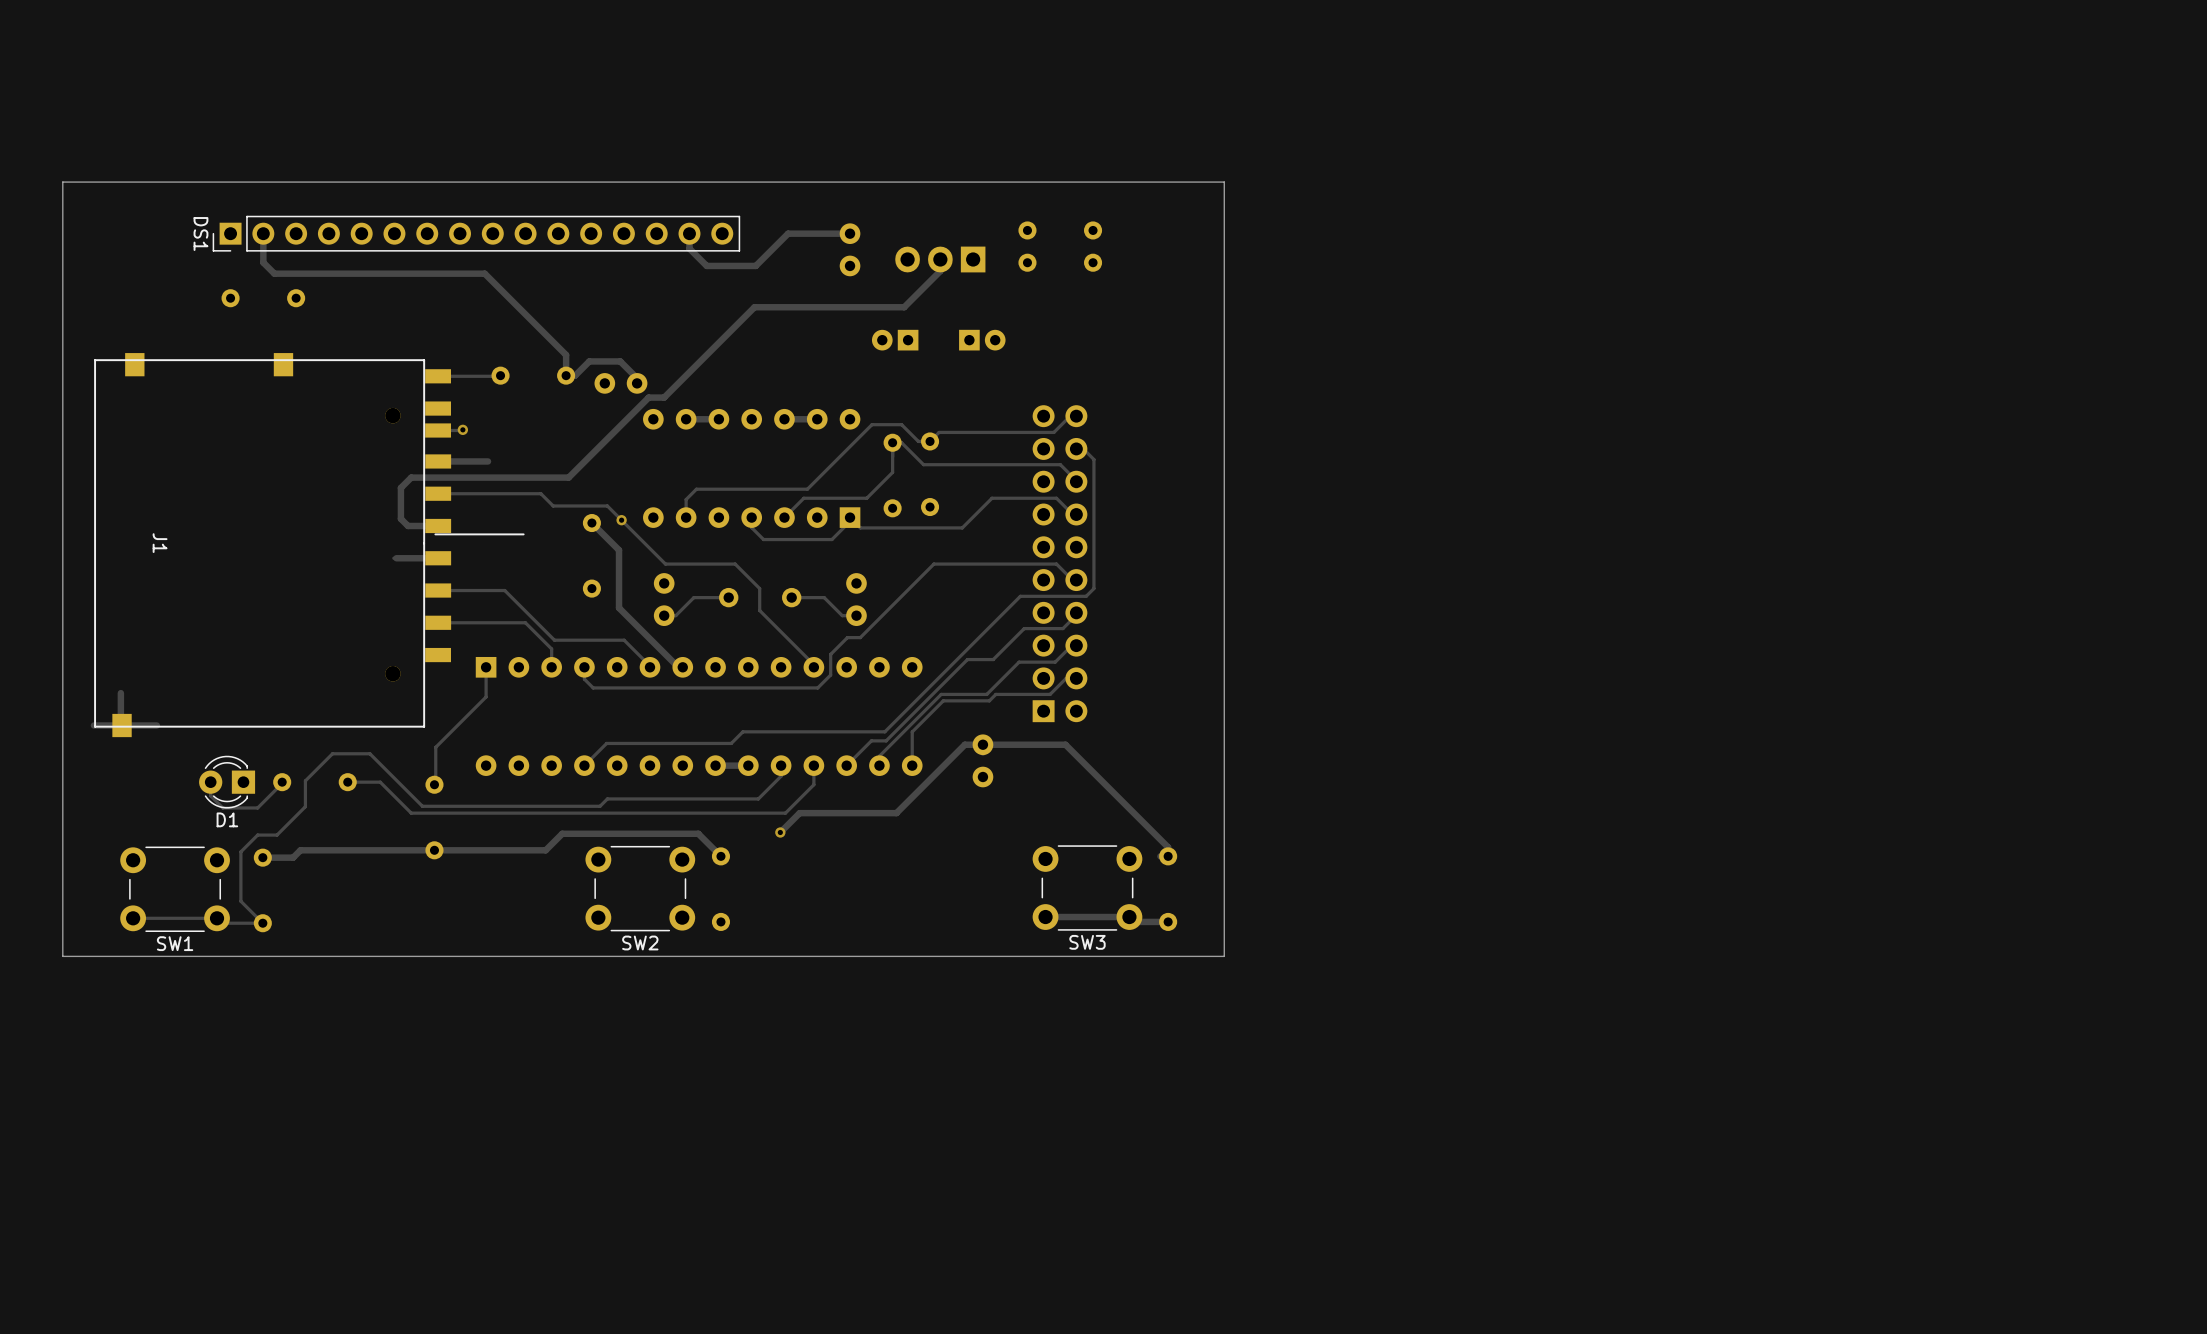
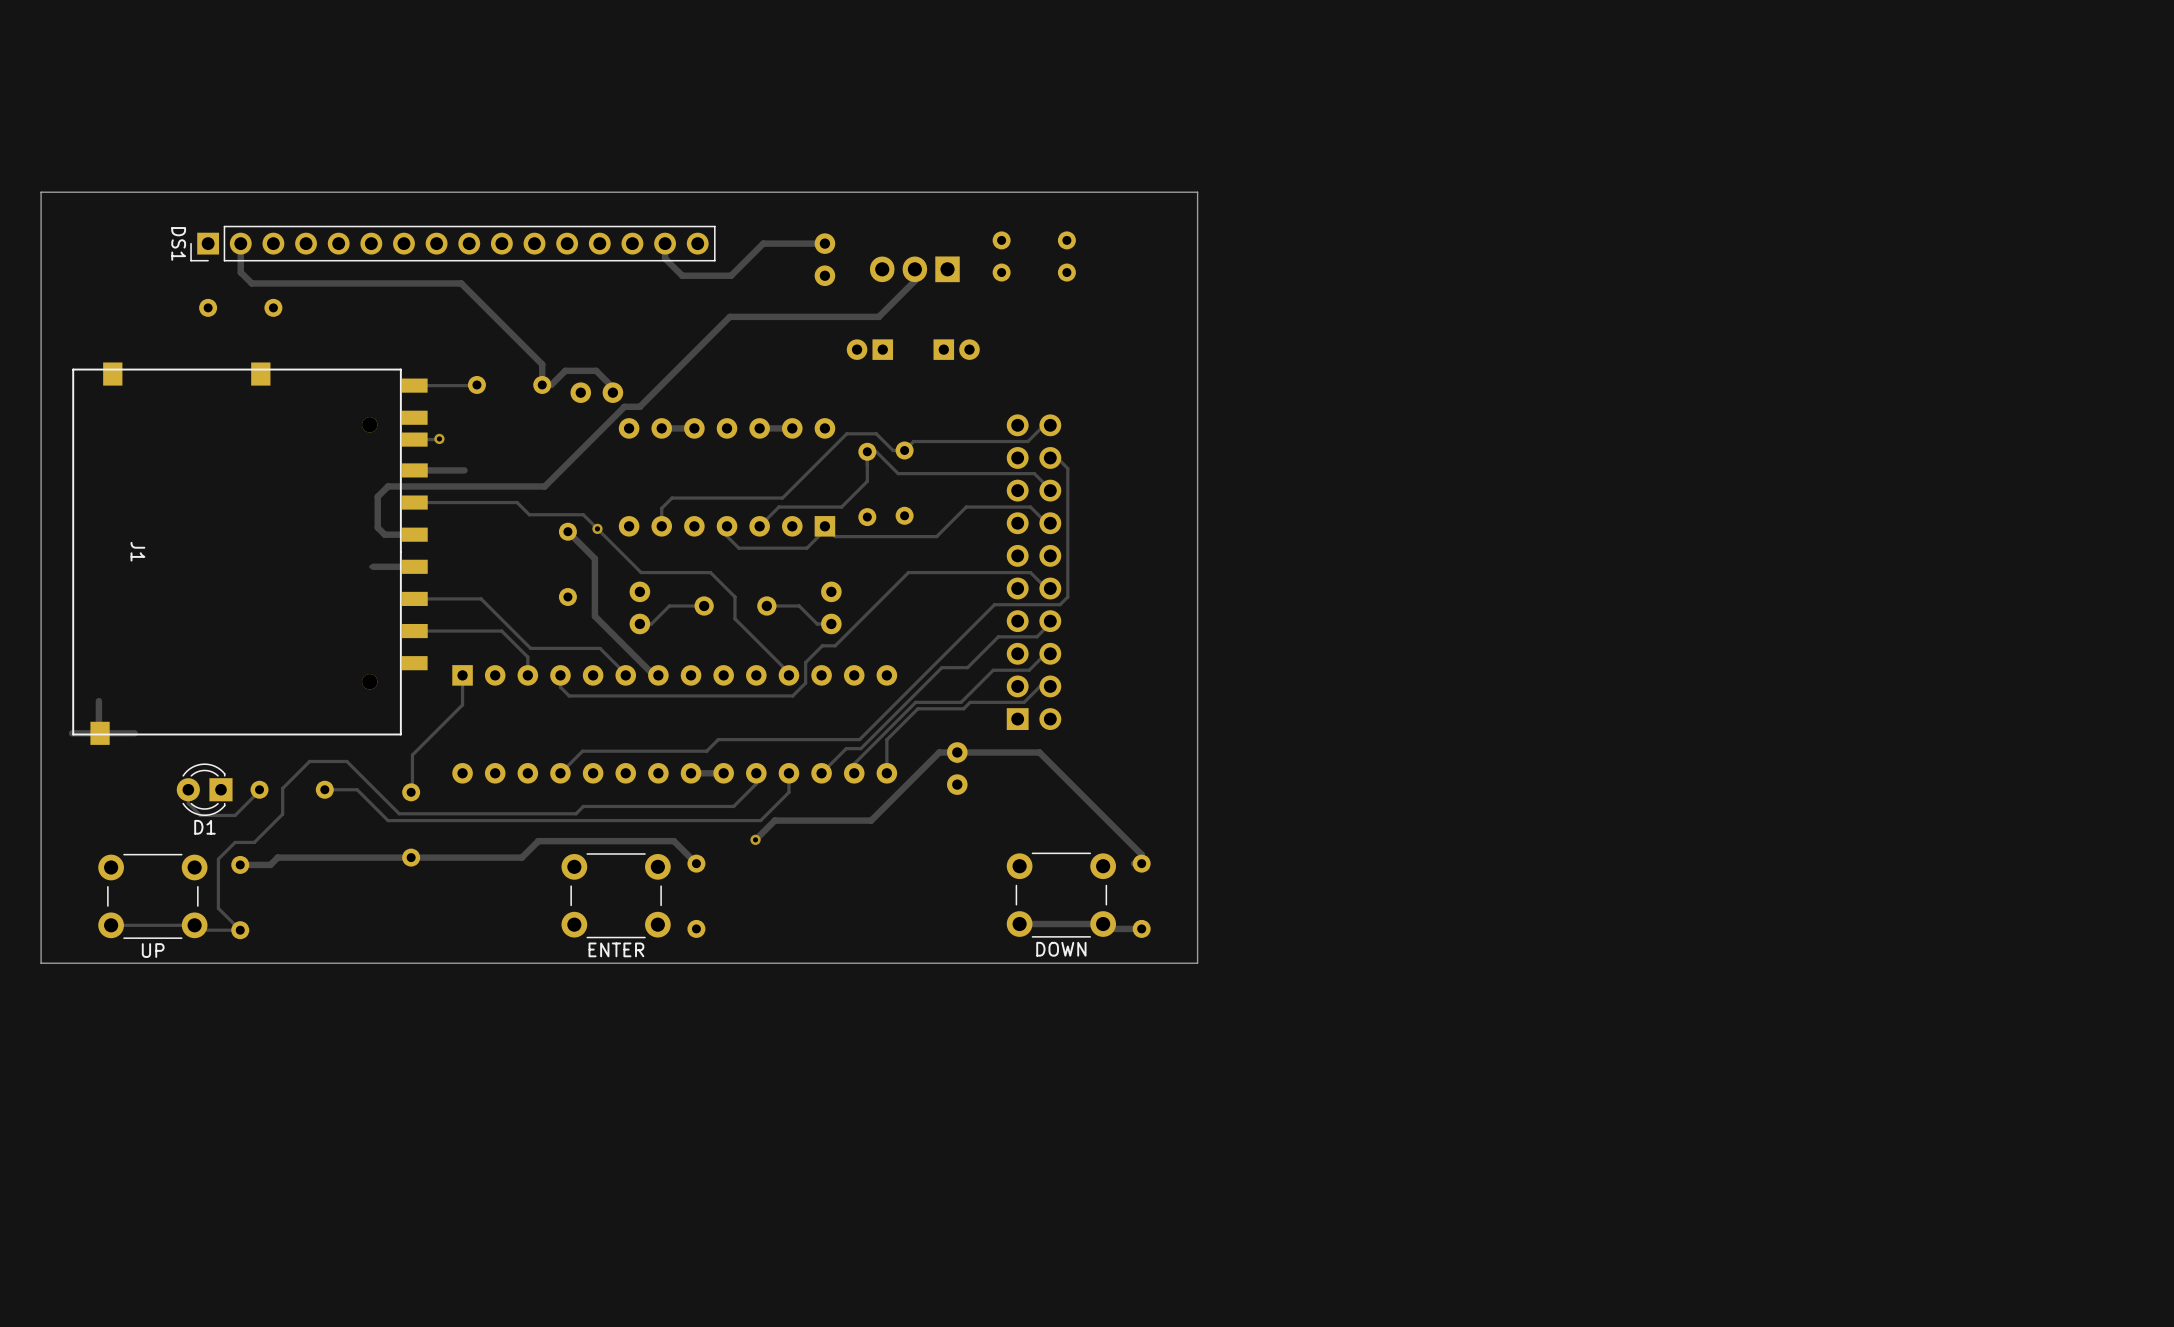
J1 footprint: [94, 353, 525, 738] -> [72, 362, 428, 745]
SW3 name: SW3 (1087, 942) -> DOWN (1061, 949)
SW1 name: SW1 (175, 943) -> UP (153, 950)
SW2 name: SW2 (640, 943) -> ENTER (616, 949)

